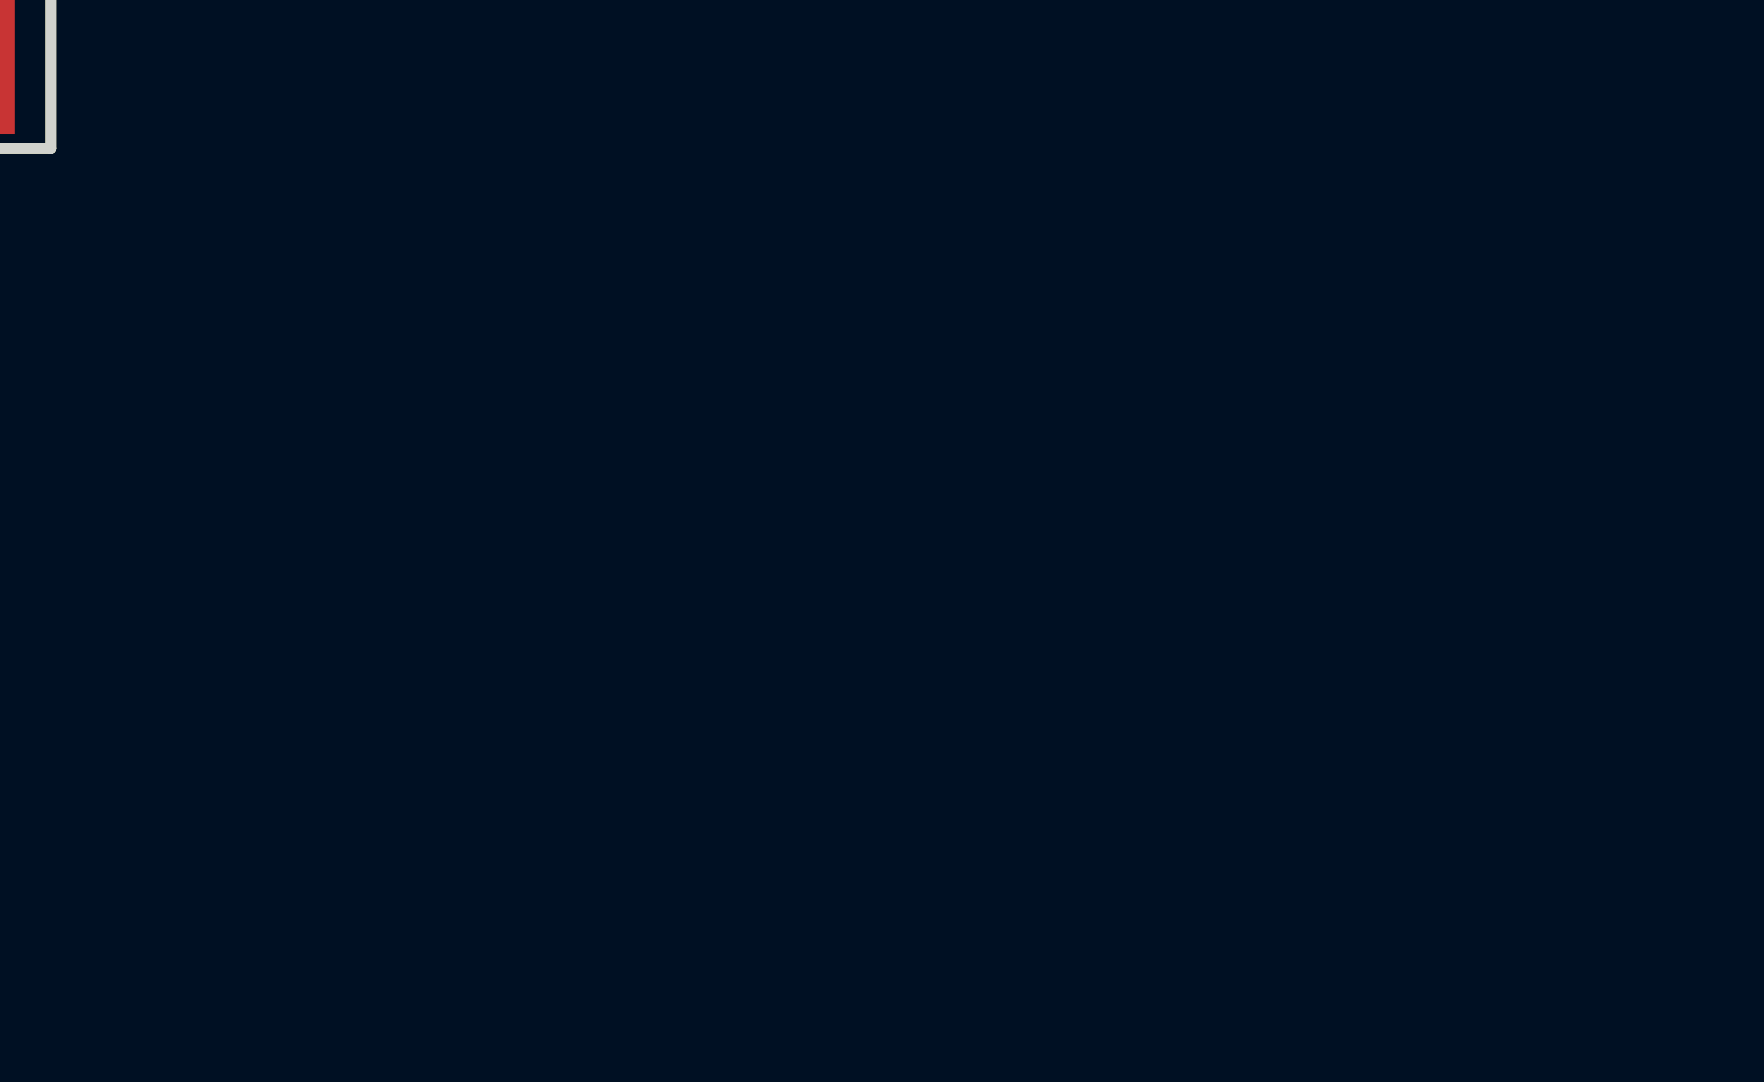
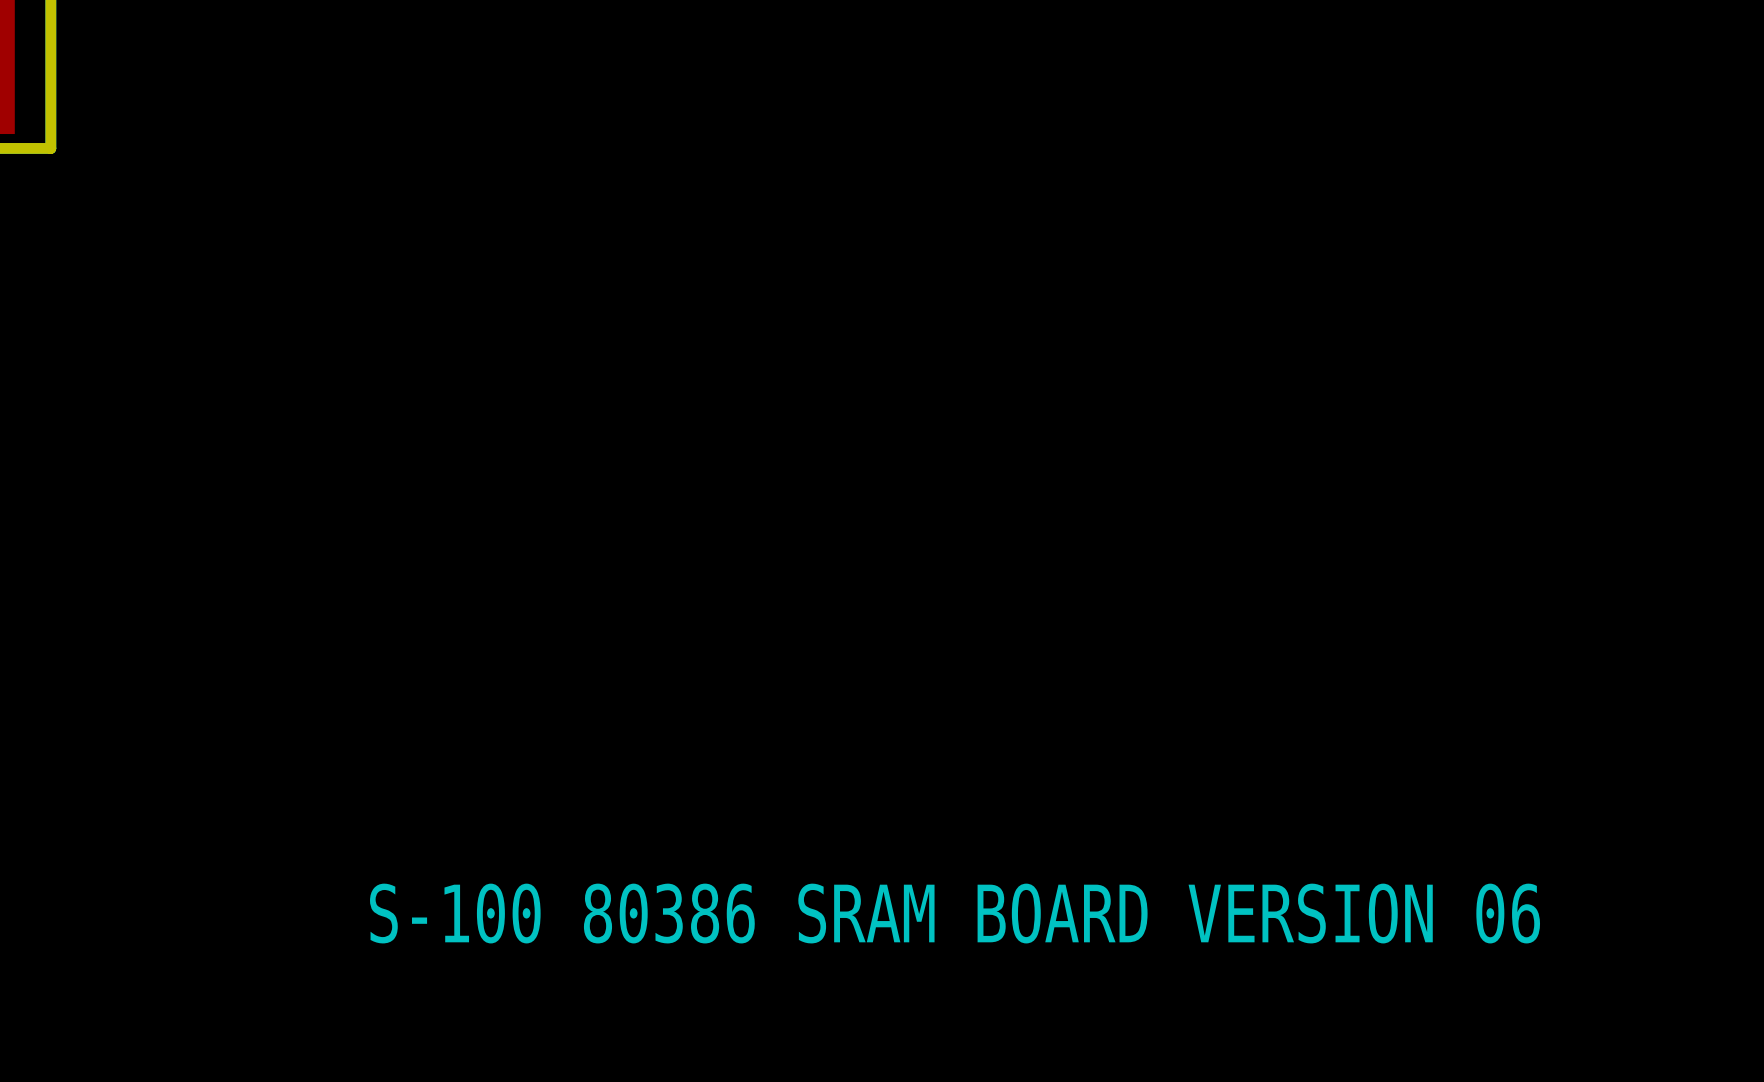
text: none -> S-100 80386 SRAM BOARD VERSION 06 (955, 913)

